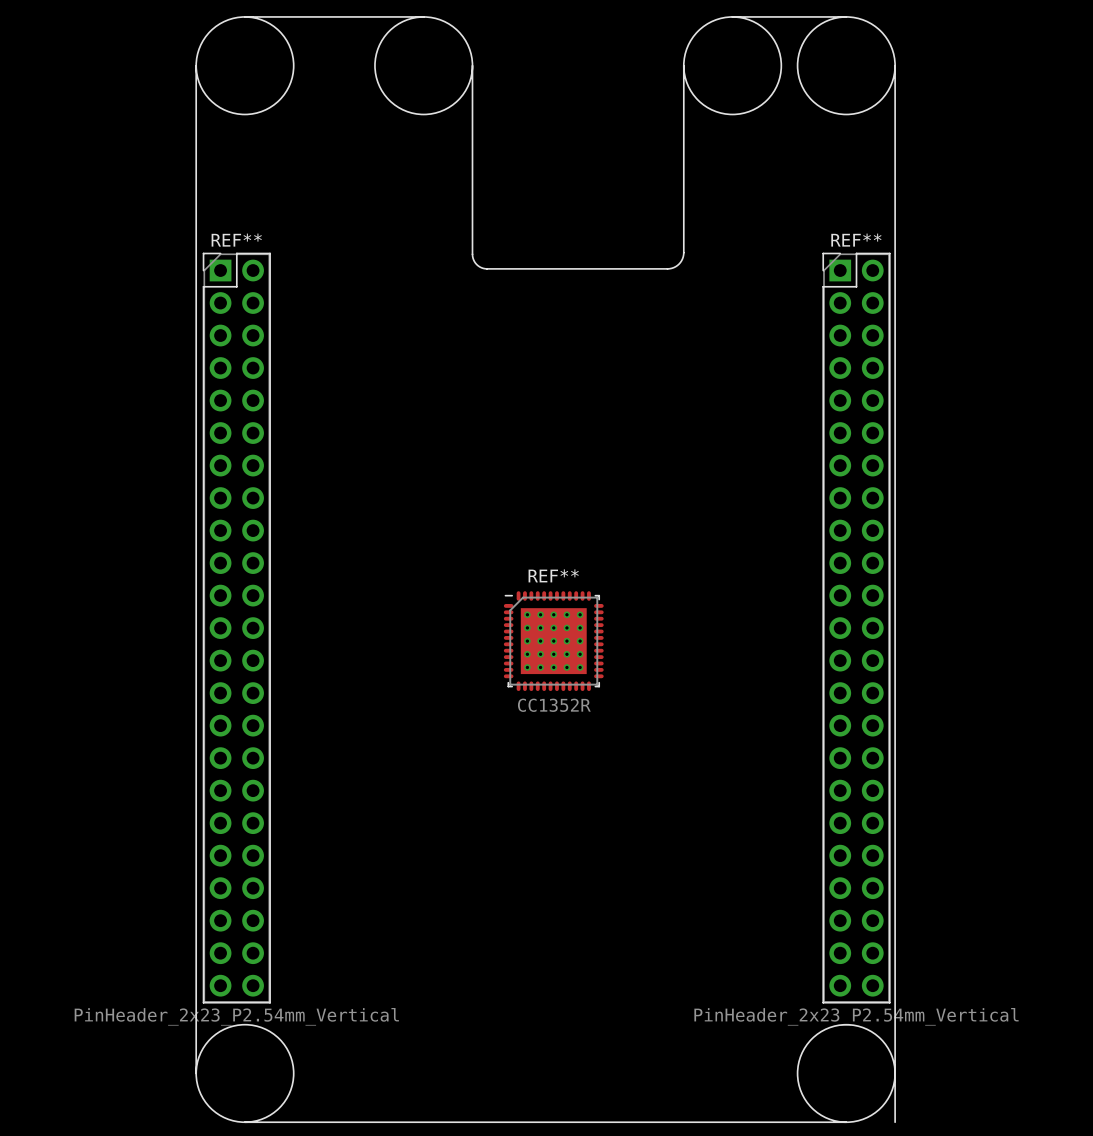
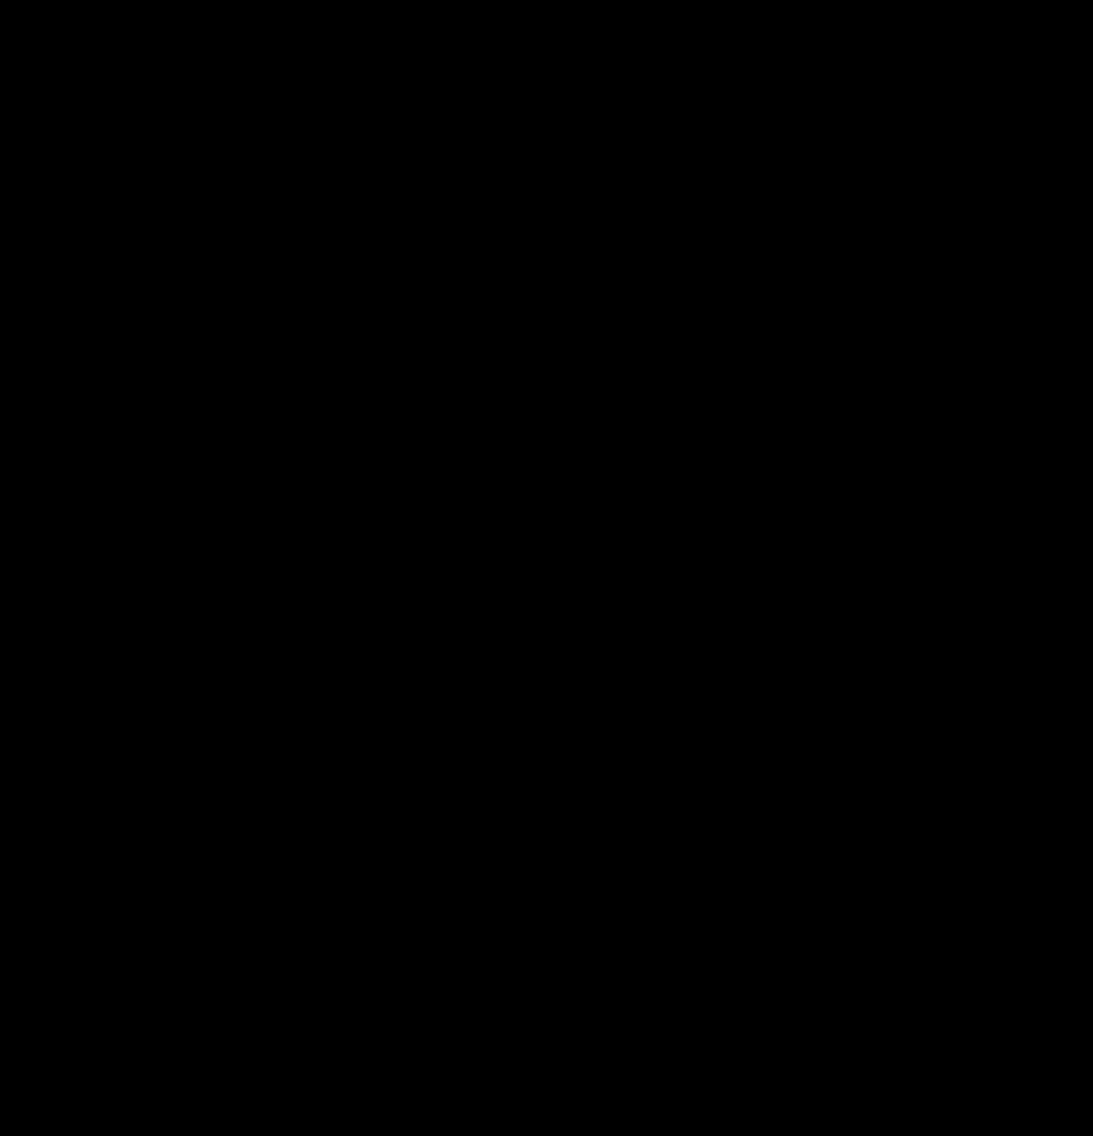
drawing: [195, 16, 295, 116] -> none
line: (244, 16) (423, 16) -> none
drawing: [374, 16, 474, 116] -> none
drawing: [683, 16, 896, 116] -> none
line: (732, 16) (846, 16) -> none
line: (196, 65) (196, 1073) -> none
line: (472, 65) (472, 256) (476, 264) (487, 268) (667, 268) (679, 264) (683, 252) (683, 65) -> none
line: (895, 65) (895, 1122) -> none
REF**: PinHeader_2x23_P2.54mm_Vertical (236, 628) -> none
REF**: PinHeader_2x23_P2.54mm_Vertical (856, 628) -> none
REF**: CC1352R (553, 641) -> none
drawing: [195, 1023, 295, 1124] -> none
drawing: [796, 1023, 896, 1124] -> none
line: (244, 1122) (846, 1122) -> none

